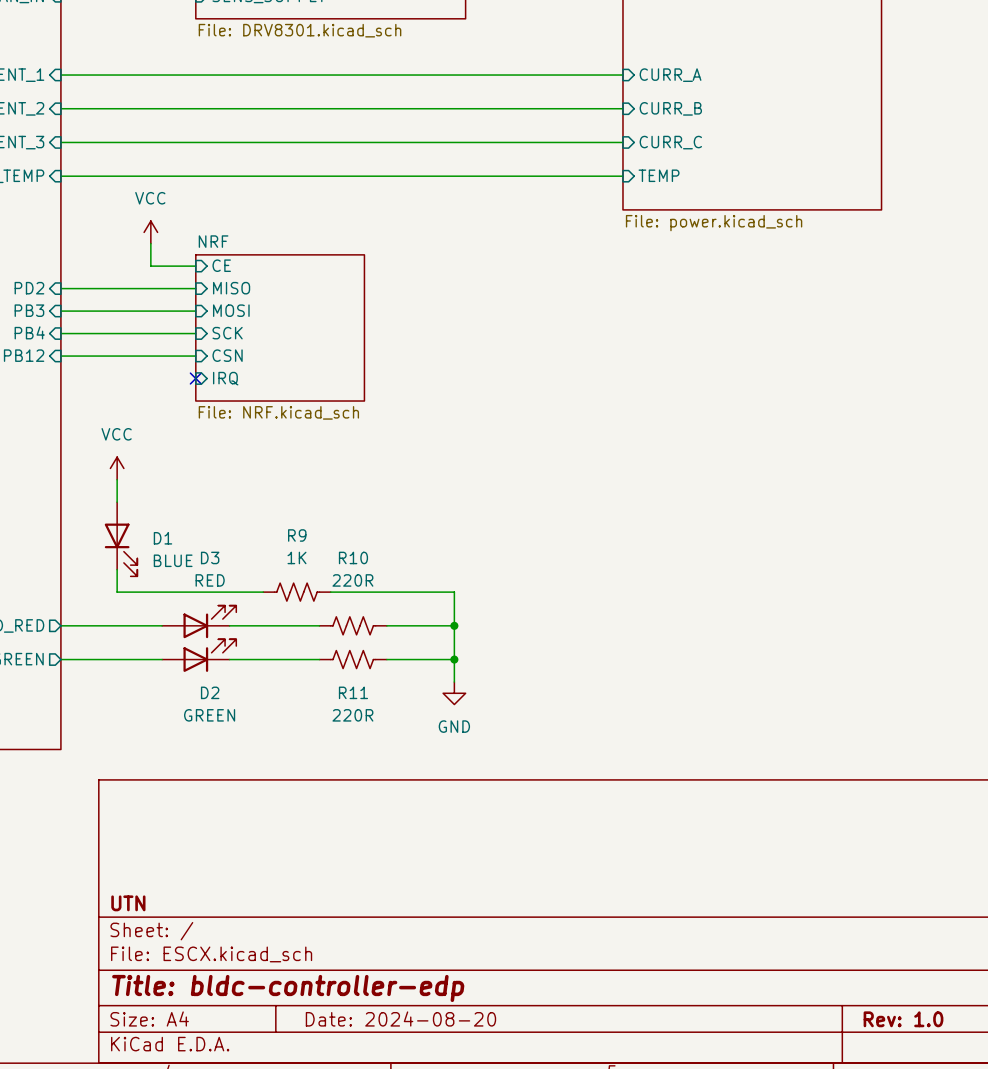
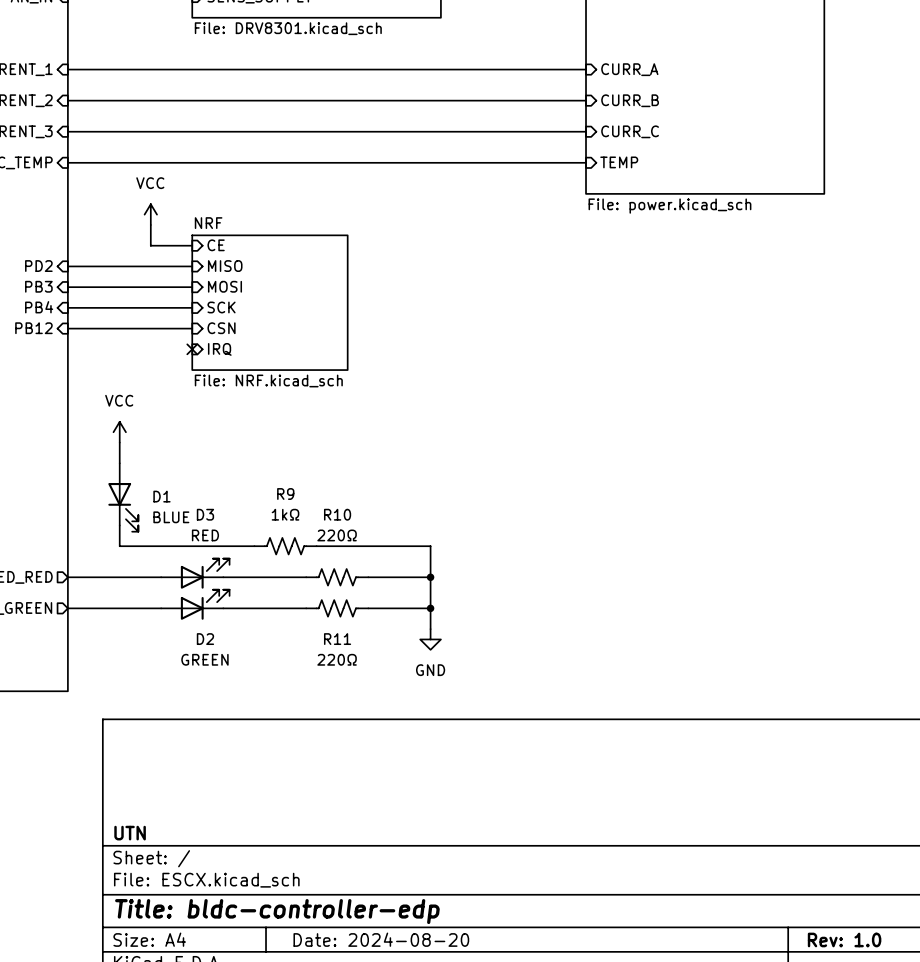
R9 value: 1K (296, 557) -> 1kΩ (285, 514)
R10 value: 220R (352, 580) -> 220Ω (337, 535)
R11 value: 220R (352, 715) -> 220Ω (337, 659)

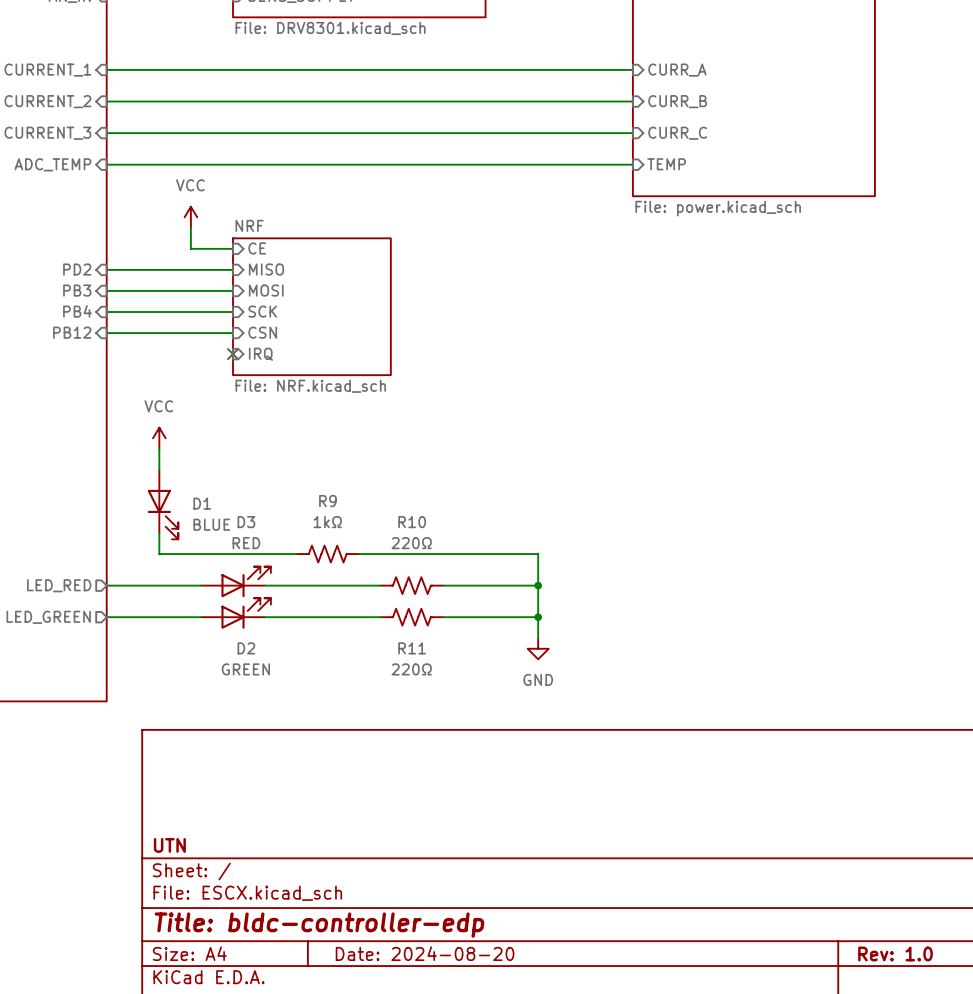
wire: (430, 546) (430, 629) -> (475, 554) (538, 554) (538, 638)
R10 position: (337, 577) -> (411, 585)
wire: none -> (475, 585) (538, 585)
junction: (430, 577) -> none
junction: none -> (538, 585)
R11 position: (337, 608) -> (411, 617)
wire: none -> (475, 617) (538, 617)
junction: (430, 608) -> none
junction: none -> (538, 617)
power symbol position: GND (430, 639) -> GND (538, 648)

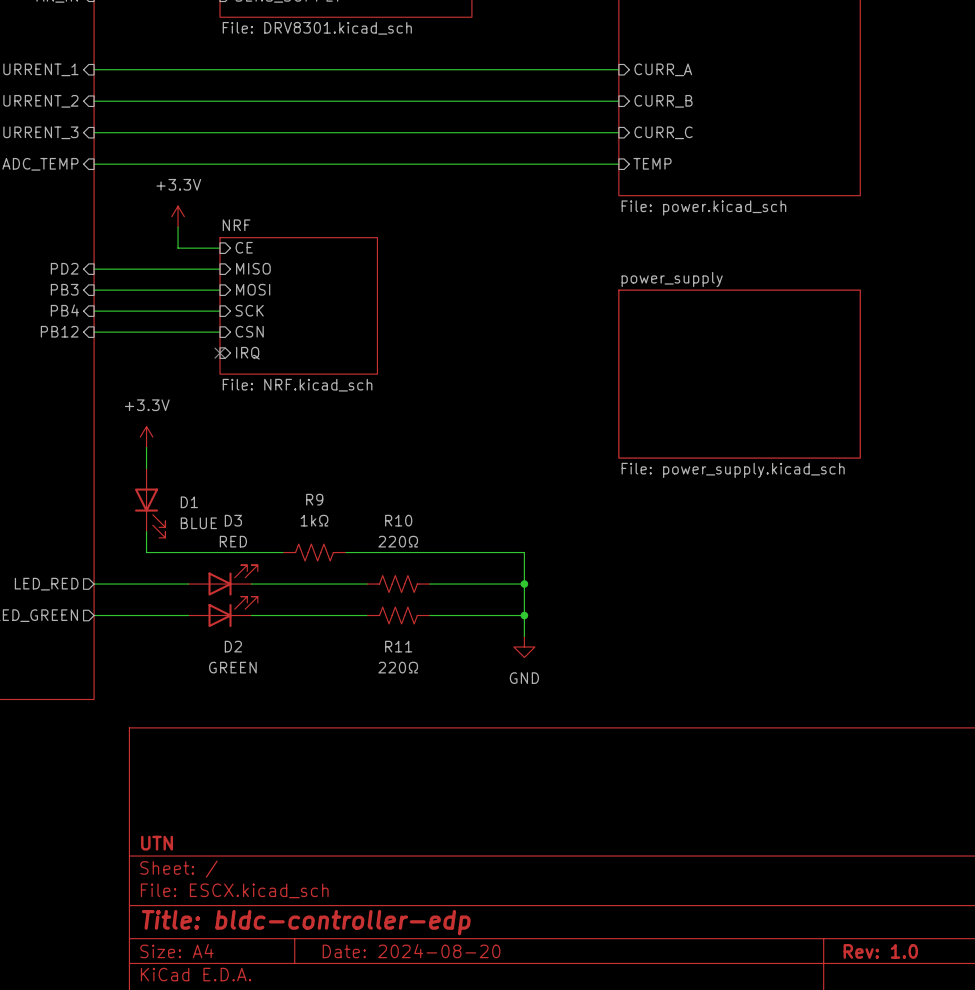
power symbol: VCC (190, 217) -> +3.3V (178, 216)
sheet power_supply: none -> File: power_supply.kicad_sch (739, 374)
power symbol: VCC (159, 438) -> +3.3V (146, 437)

